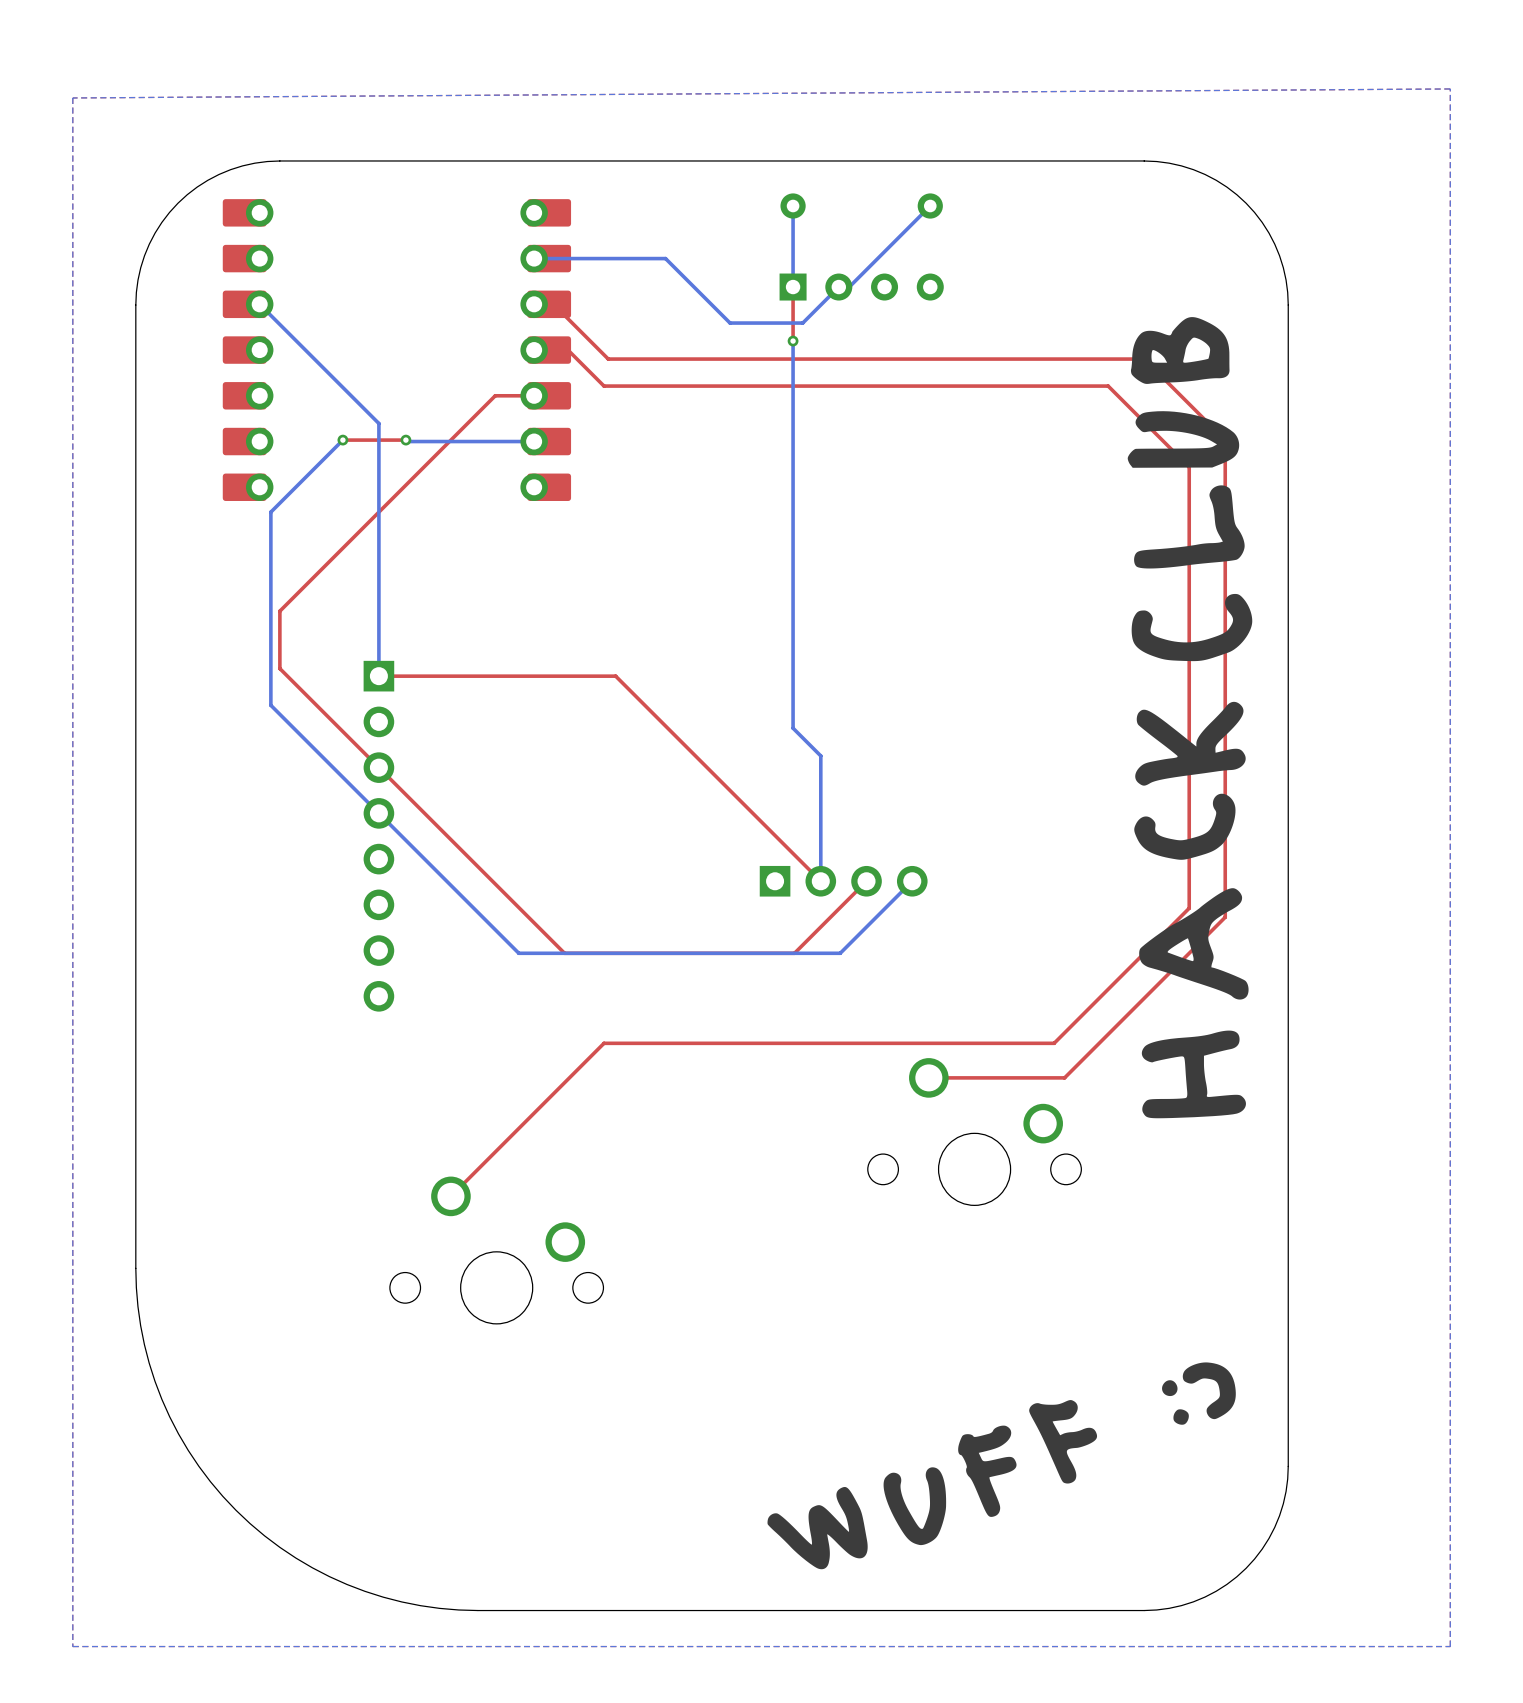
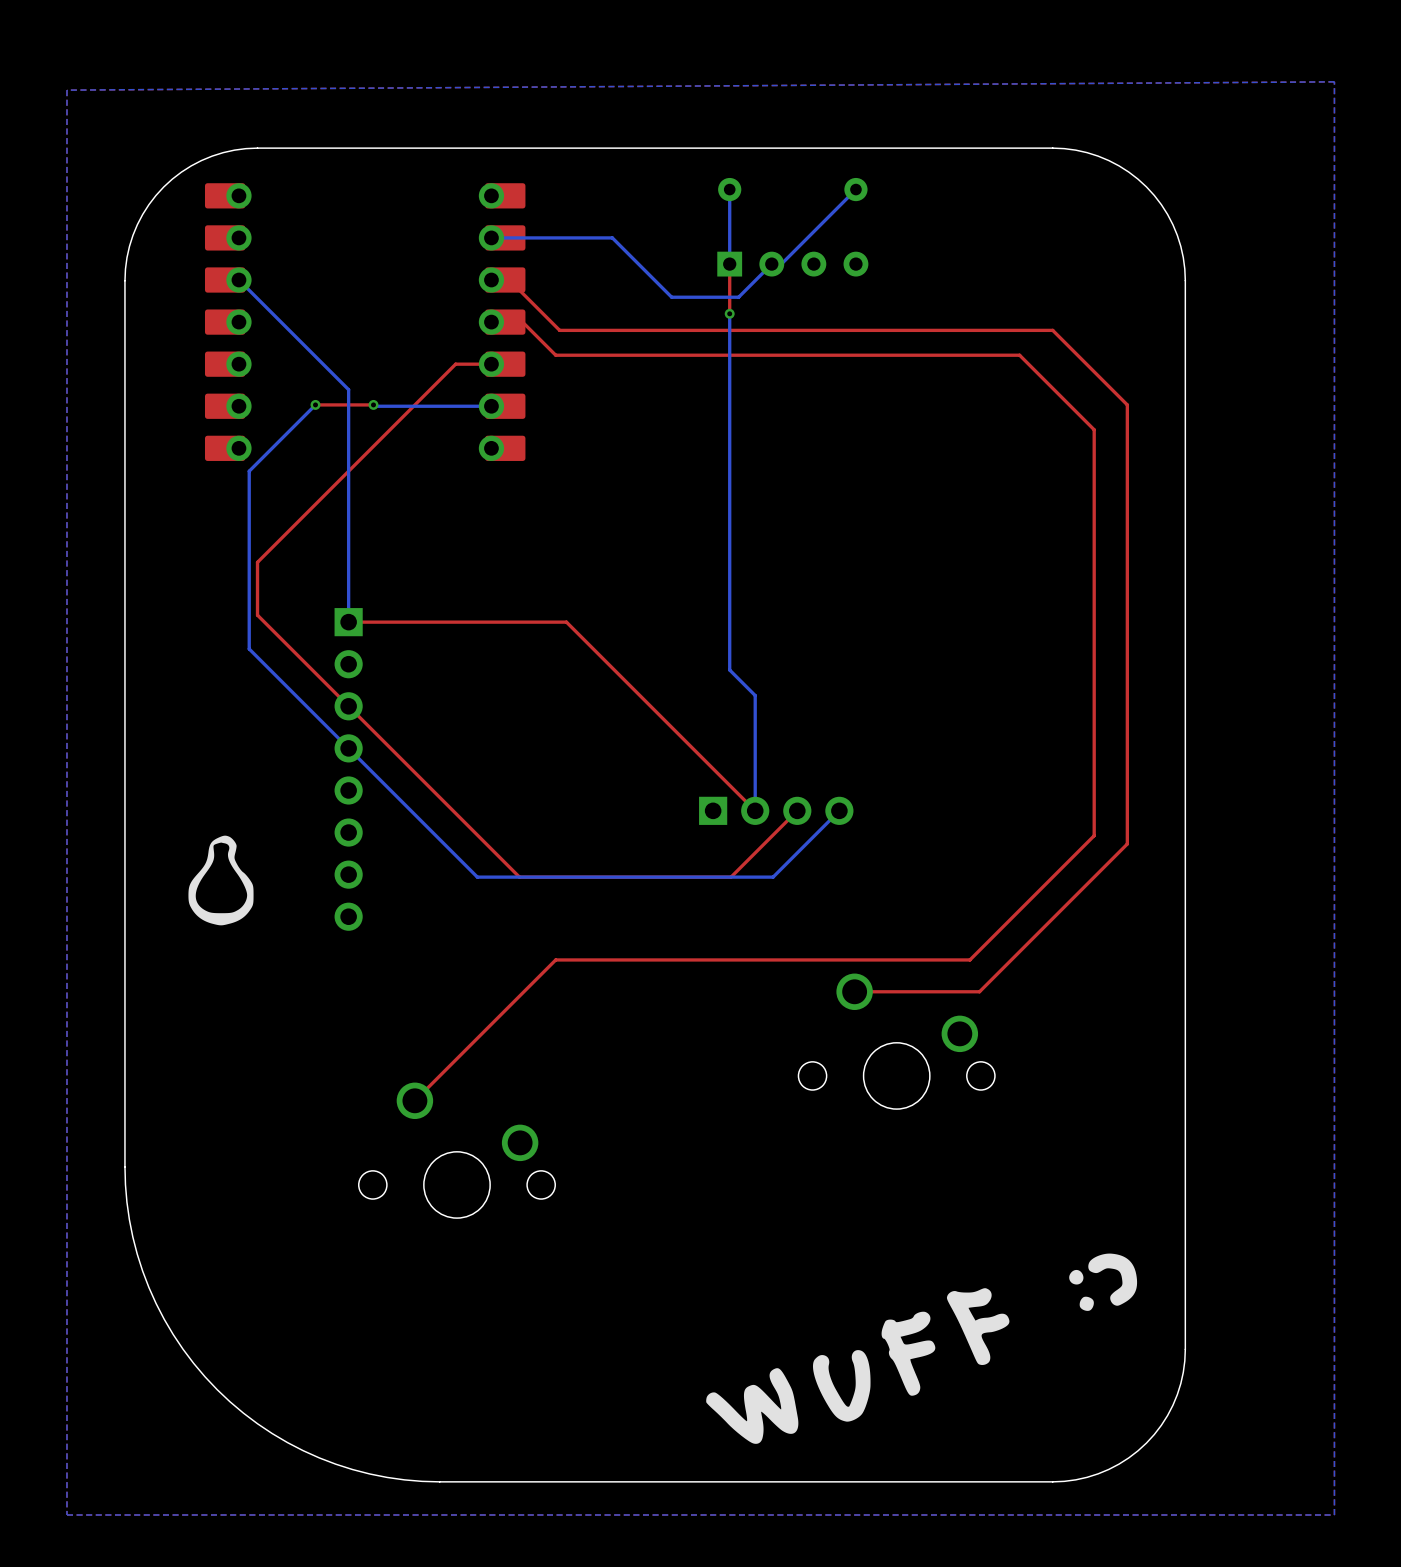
drawing: [1130, 317, 1230, 384] -> none
drawing: [1127, 411, 1245, 569] -> none
drawing: [1131, 593, 1253, 662] -> none
drawing: [1134, 701, 1246, 860] -> none
drawing: [1139, 888, 1249, 1000] -> none
drawing: none -> [188, 835, 254, 926]
drawing: [1141, 1030, 1246, 1119] -> none

